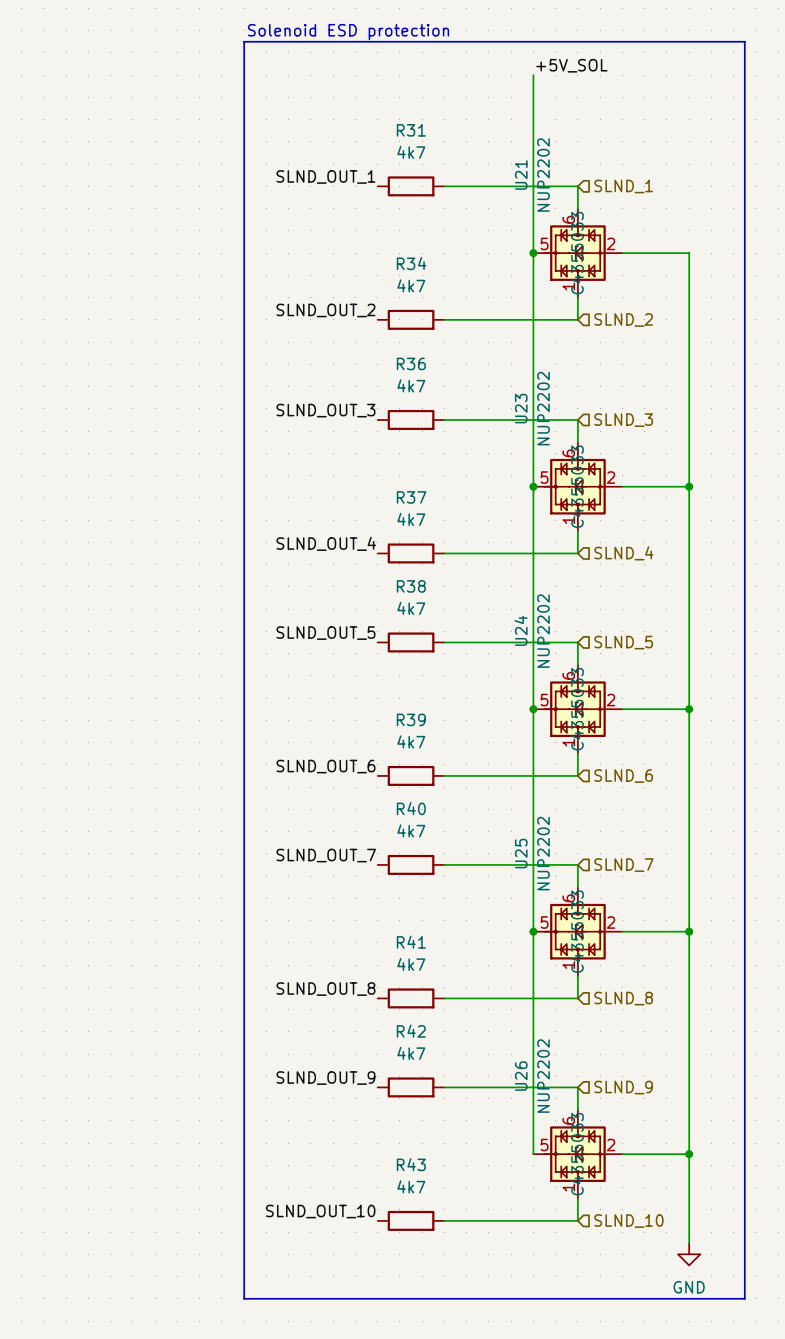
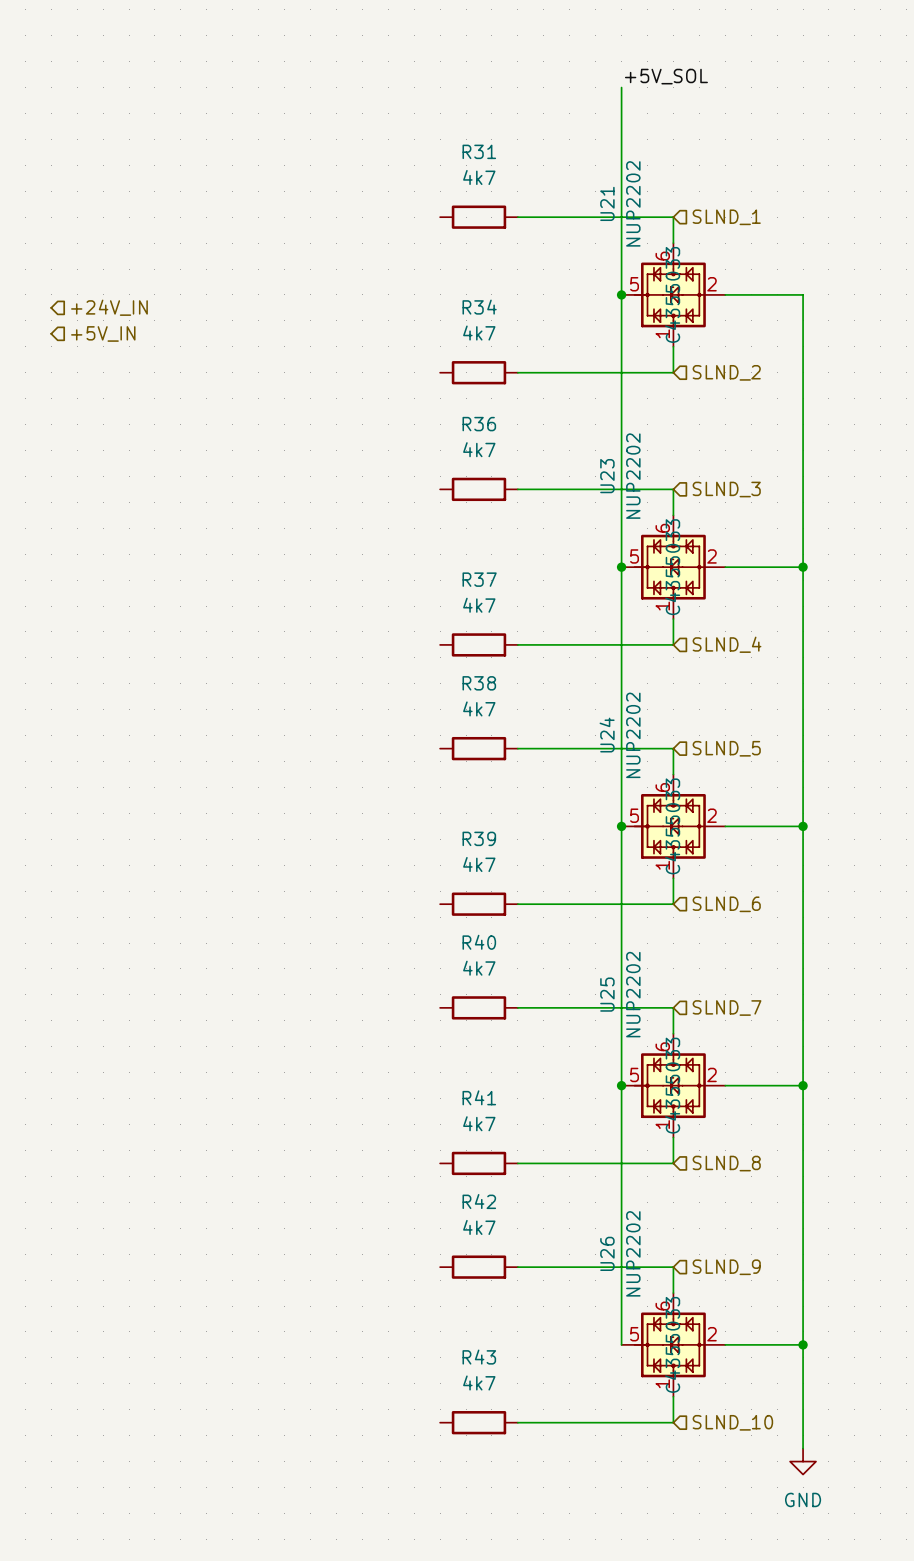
text: Solenoid ESD protection (348, 32) -> none
line: (244, 41) (744, 41) (744, 1298) (244, 1298) (244, 41) -> none
label: SLND_OUT_1 (325, 176) -> none
hierarchical label: none -> +24V_IN (109, 307)
hierarchical label: none -> +5V_IN (103, 333)
label: SLND_OUT_2 (325, 310) -> none
label: SLND_OUT_3 (325, 410) -> none
label: SLND_OUT_4 (326, 543) -> none
label: SLND_OUT_5 (325, 633) -> none
label: SLND_OUT_6 (325, 766) -> none
label: SLND_OUT_7 (326, 855) -> none
label: SLND_OUT_8 (325, 989) -> none
label: SLND_OUT_9 (325, 1078) -> none
label: SLND_OUT_10 (320, 1211) -> none

